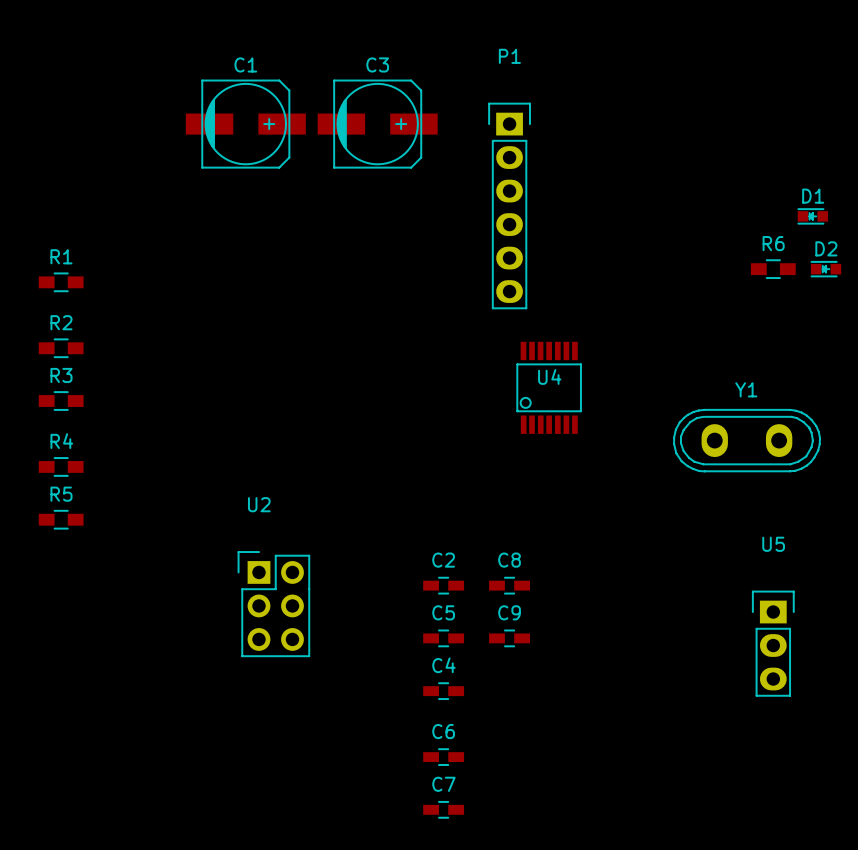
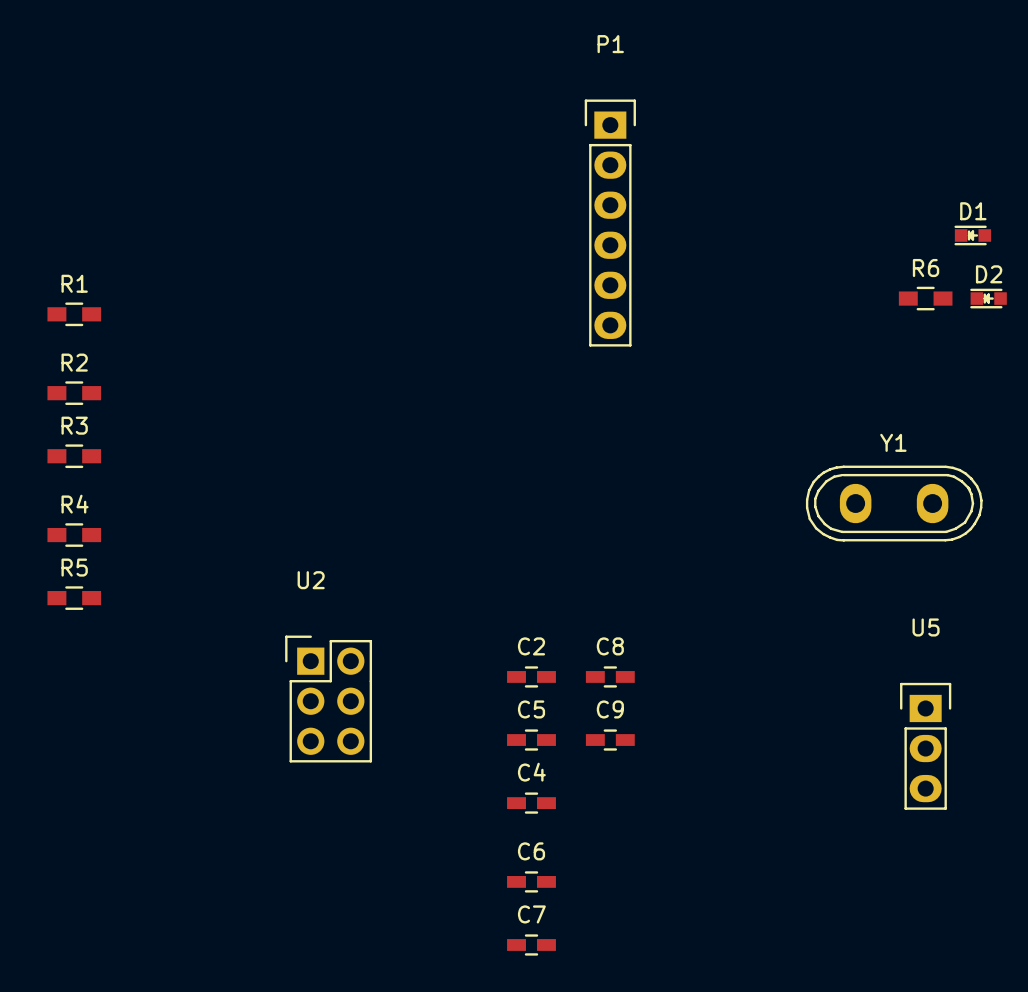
C1: (245, 124) -> none
C3: (377, 124) -> none
U4: (549, 387) -> none

